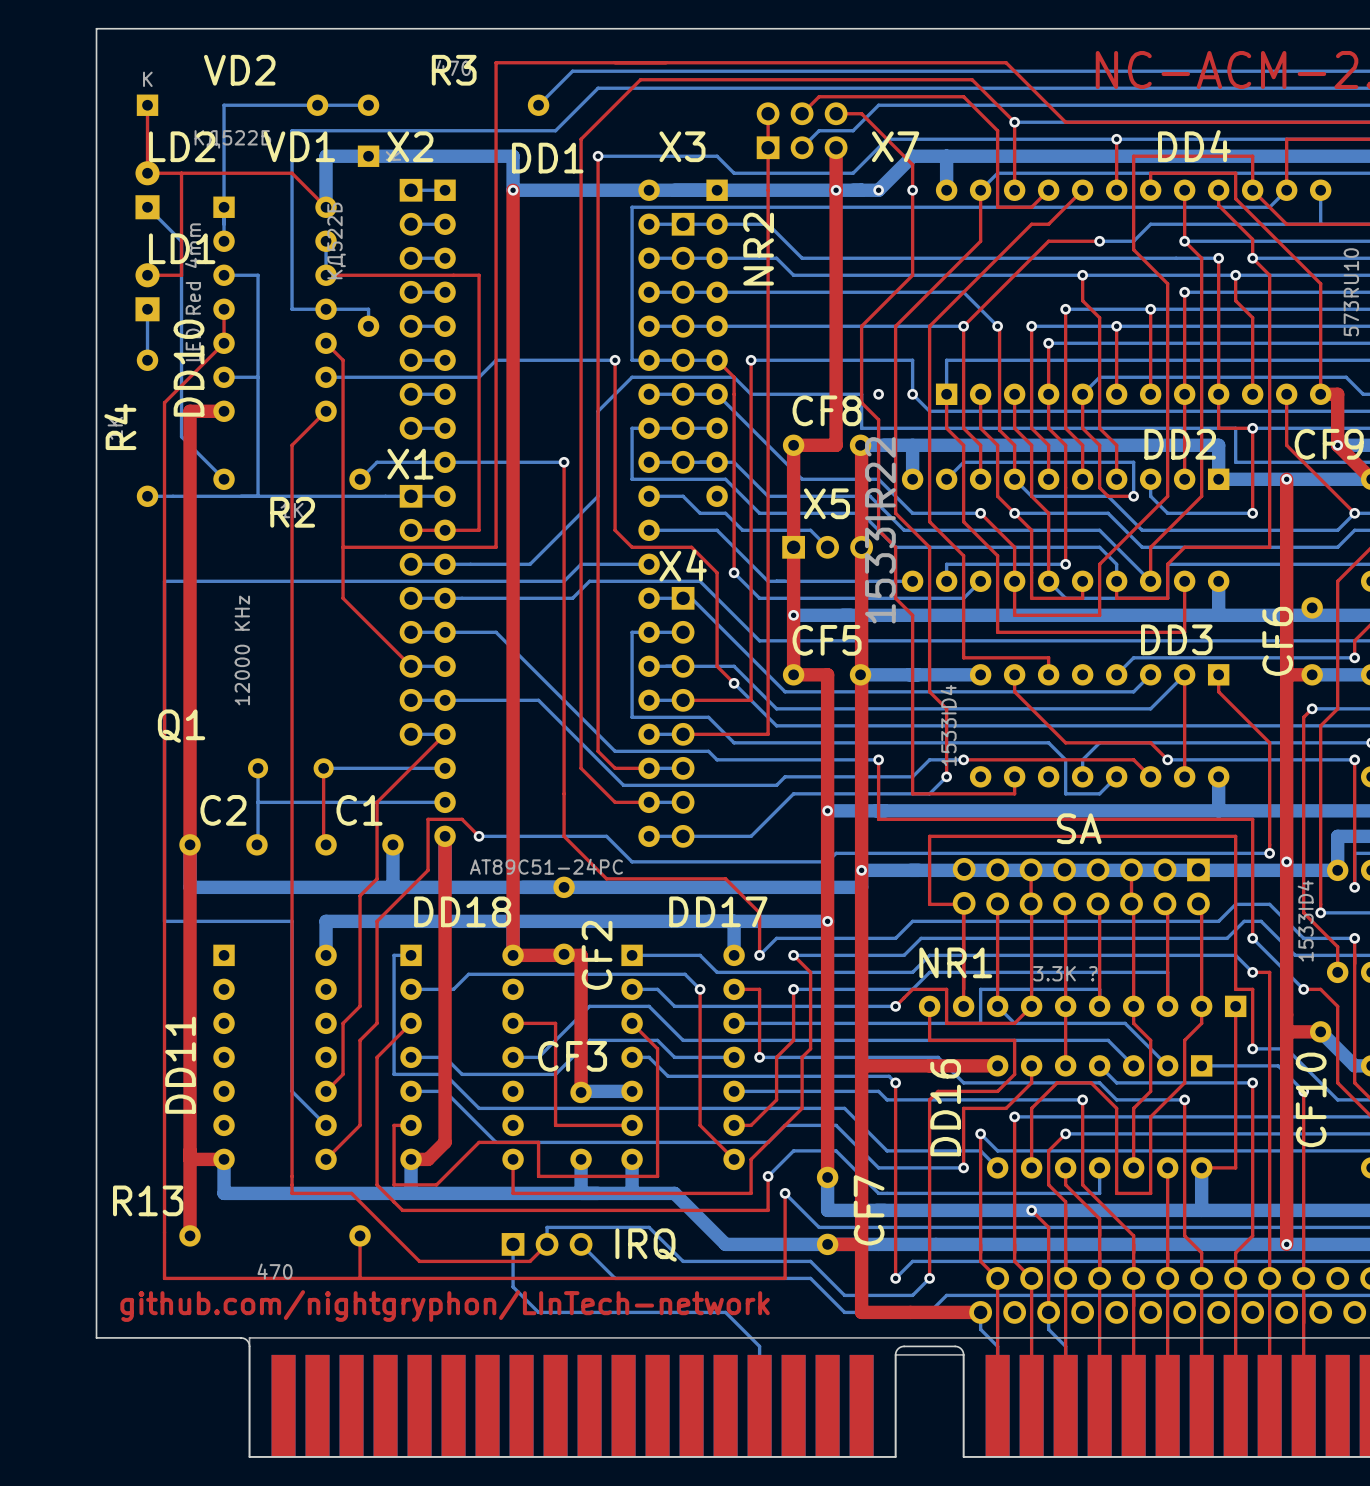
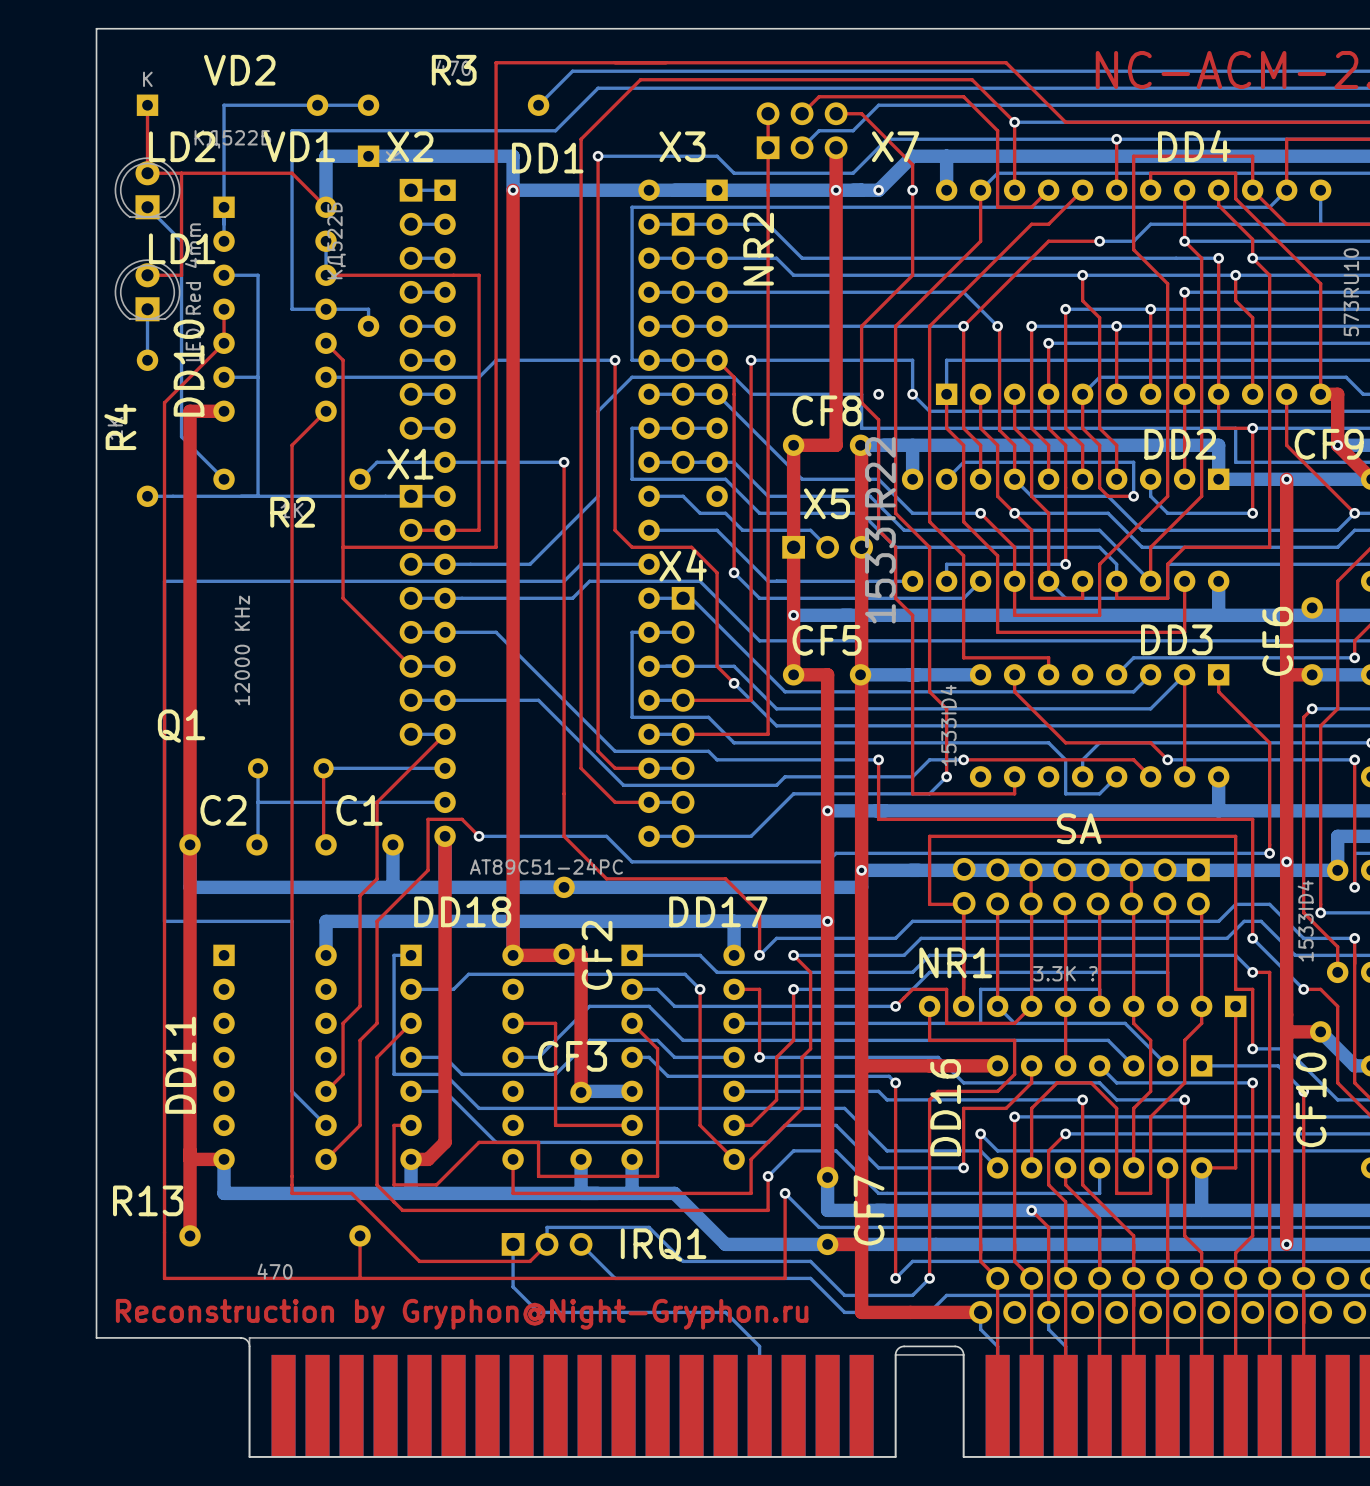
LD2 footprint: [135, 161, 160, 220] -> [114, 157, 181, 220]
LD1 footprint: [135, 263, 160, 322] -> [114, 259, 181, 322]
IRQ name: IRQ (646, 1245) -> IRQ1 (663, 1245)
text: github.com/nightgryphon/LInTech-network (445, 1306) -> none
text: none -> Reconstruction by Gryphon@Night-Gryphon.ru (462, 1314)

